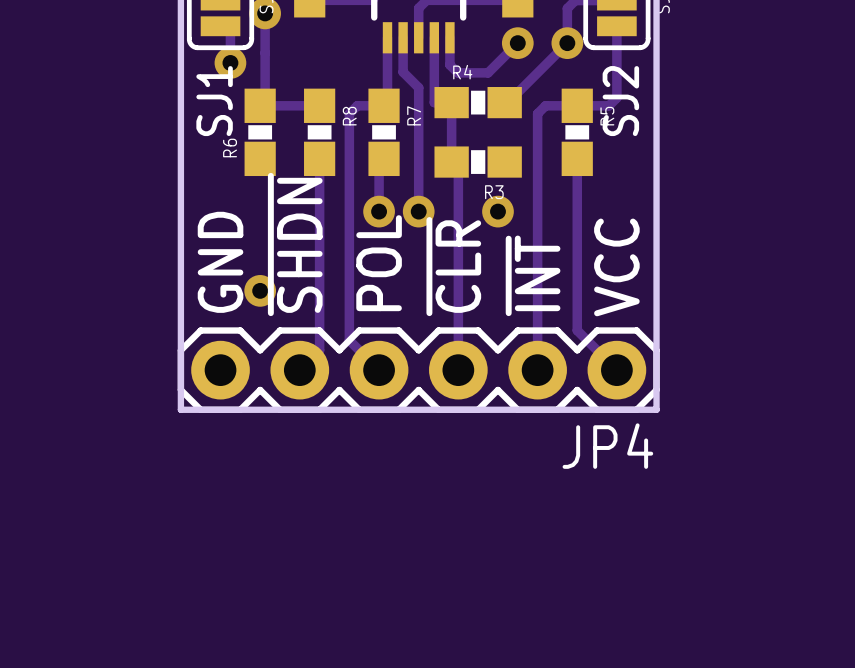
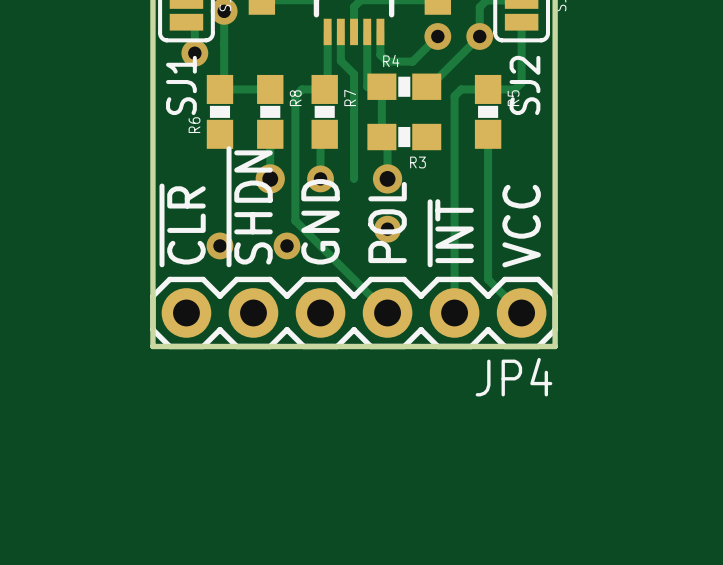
track: (319, 211) (319, 350) (299, 370) -> none
via: none -> (270, 178)
via: (418, 211) -> none
track: (458, 211) (458, 370) -> none
via: none -> (387, 178)
via: (497, 211) -> none
track: (349, 261) (349, 340) (379, 370) -> (295, 220) (387, 312)
text: GND (220, 262) -> ~{CLR} (182, 225)
text: POL (379, 263) -> GND (320, 221)
text: ~{CLR} (453, 266) -> POL (387, 222)
via: none -> (387, 229)
via: none -> (287, 245)

